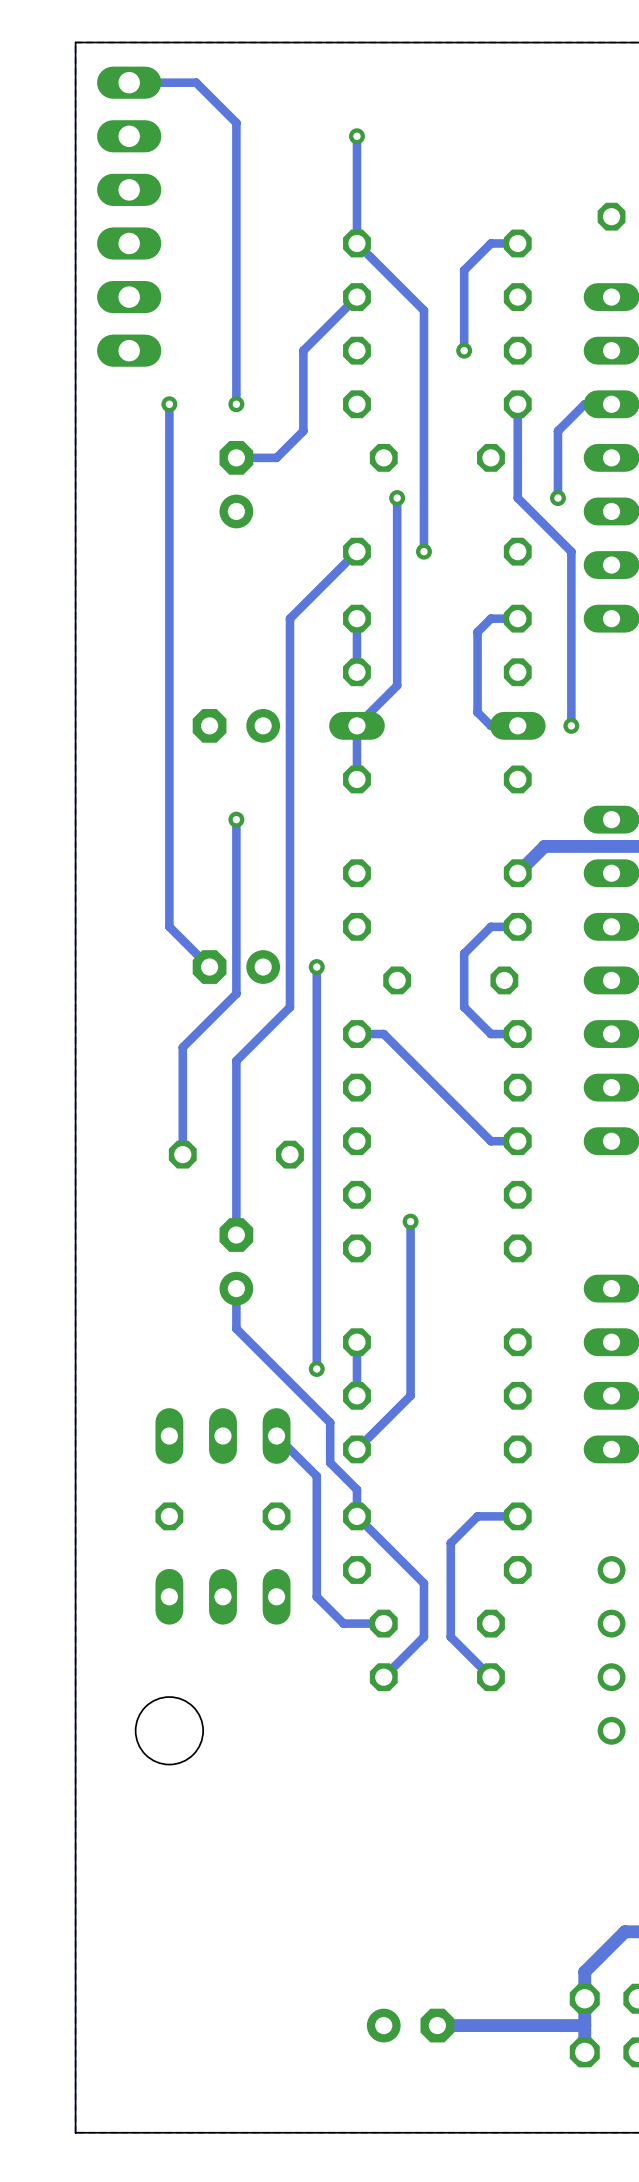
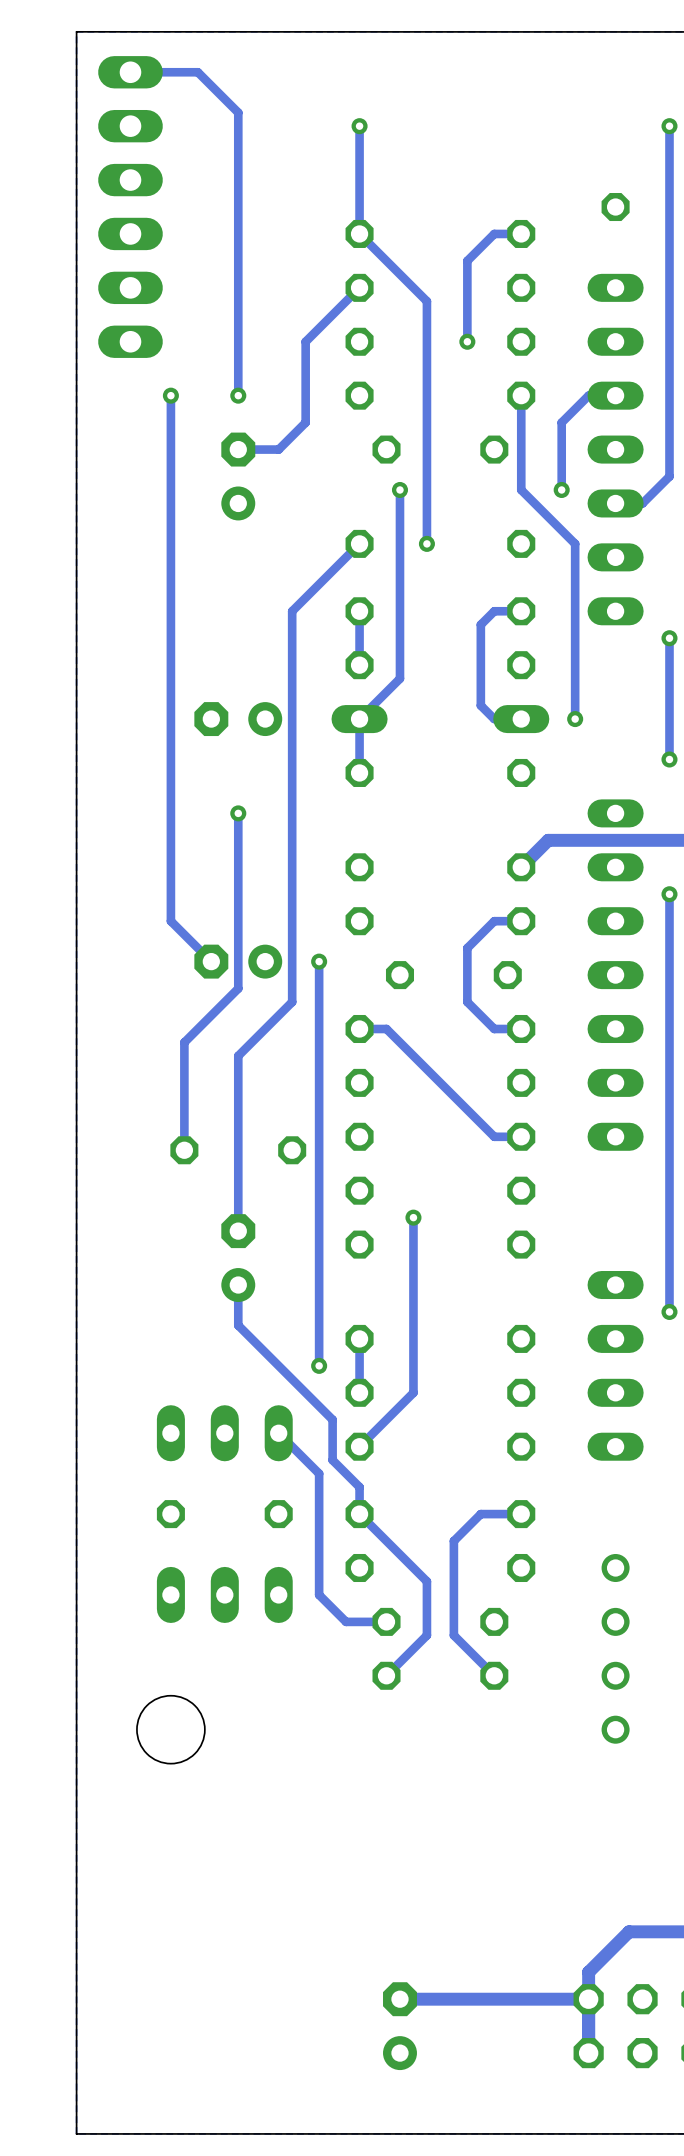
track: none -> (588, 1999) (399, 1999)
part rotation: 0° (410, 2025) -> 90° counterclockwise (399, 2026)
track: (584, 2025) (437, 2025) -> none

